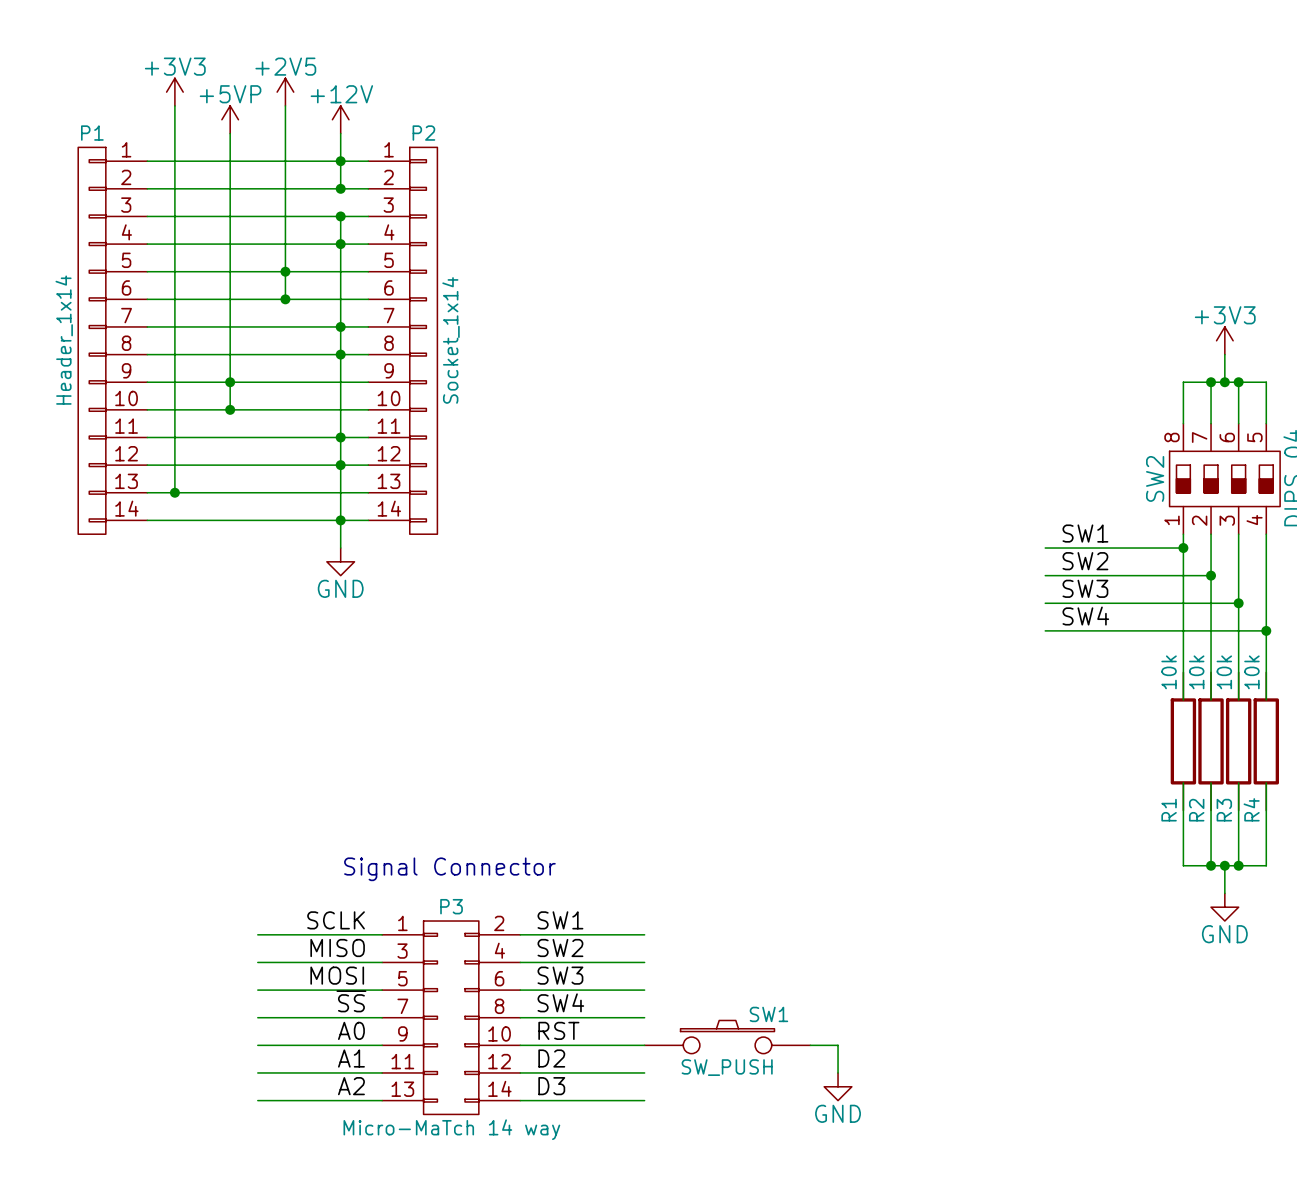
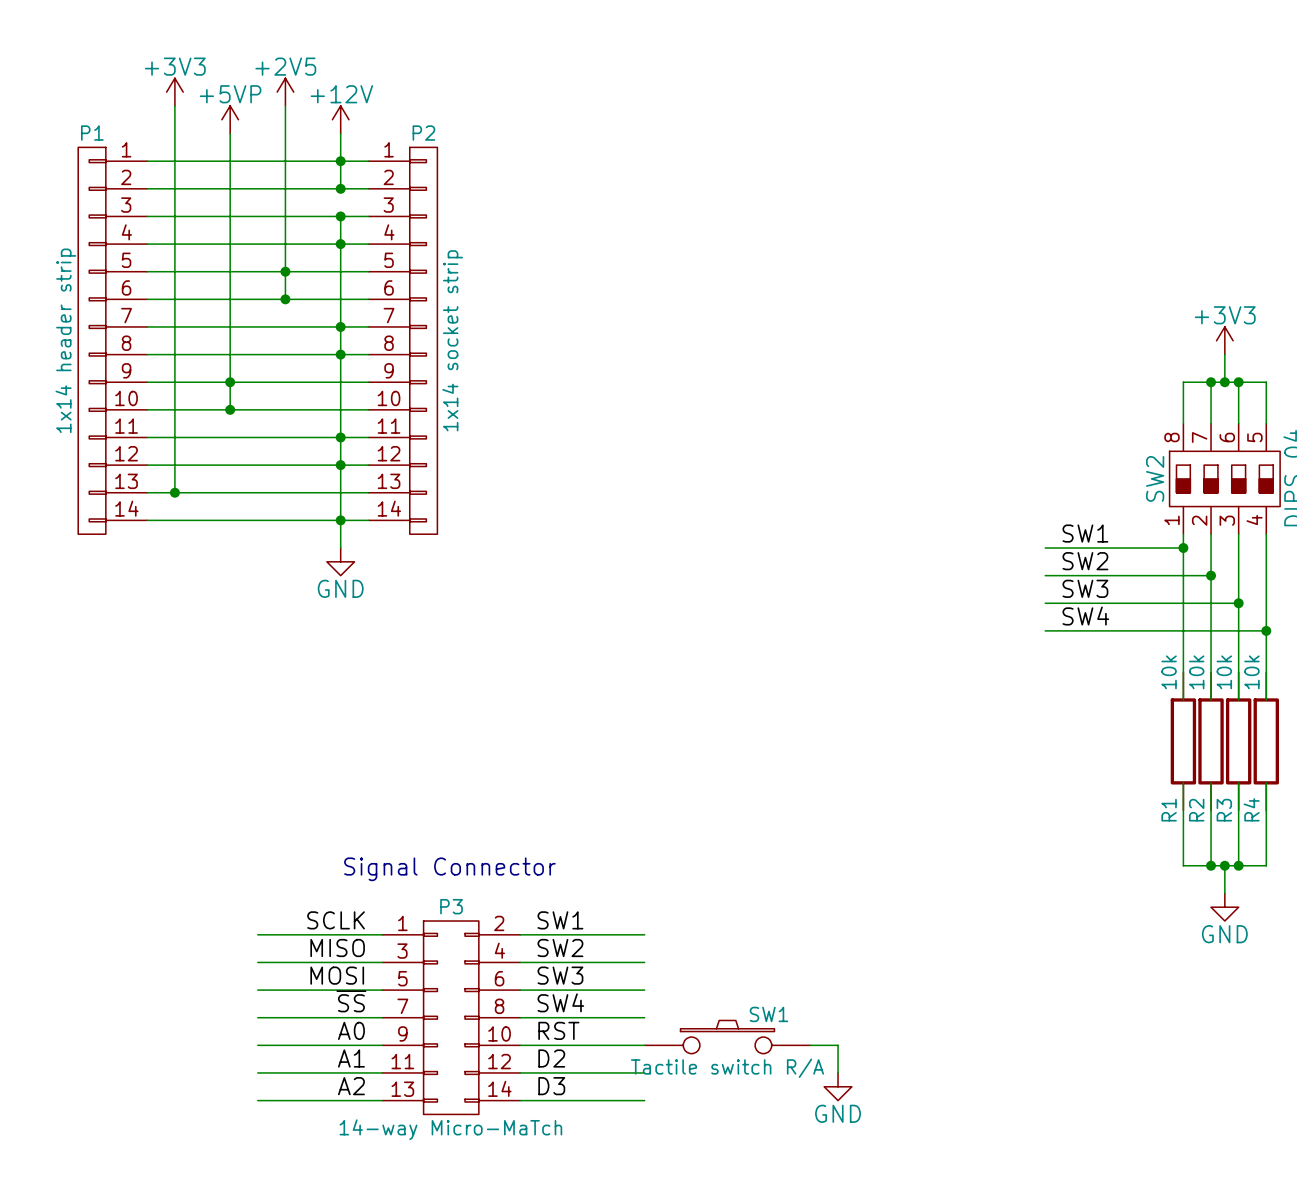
P1 value: Header_1x14 (64, 340) -> 1x14 header strip (65, 340)
P2 value: Socket_1x14 (451, 340) -> 1x14 socket strip (452, 340)
SW1 value: SW_PUSH (727, 1067) -> Tactile switch R/A (727, 1068)
P3 value: Micro-MaTch 14 way (451, 1129) -> 14-way Micro-MaTch (450, 1129)

